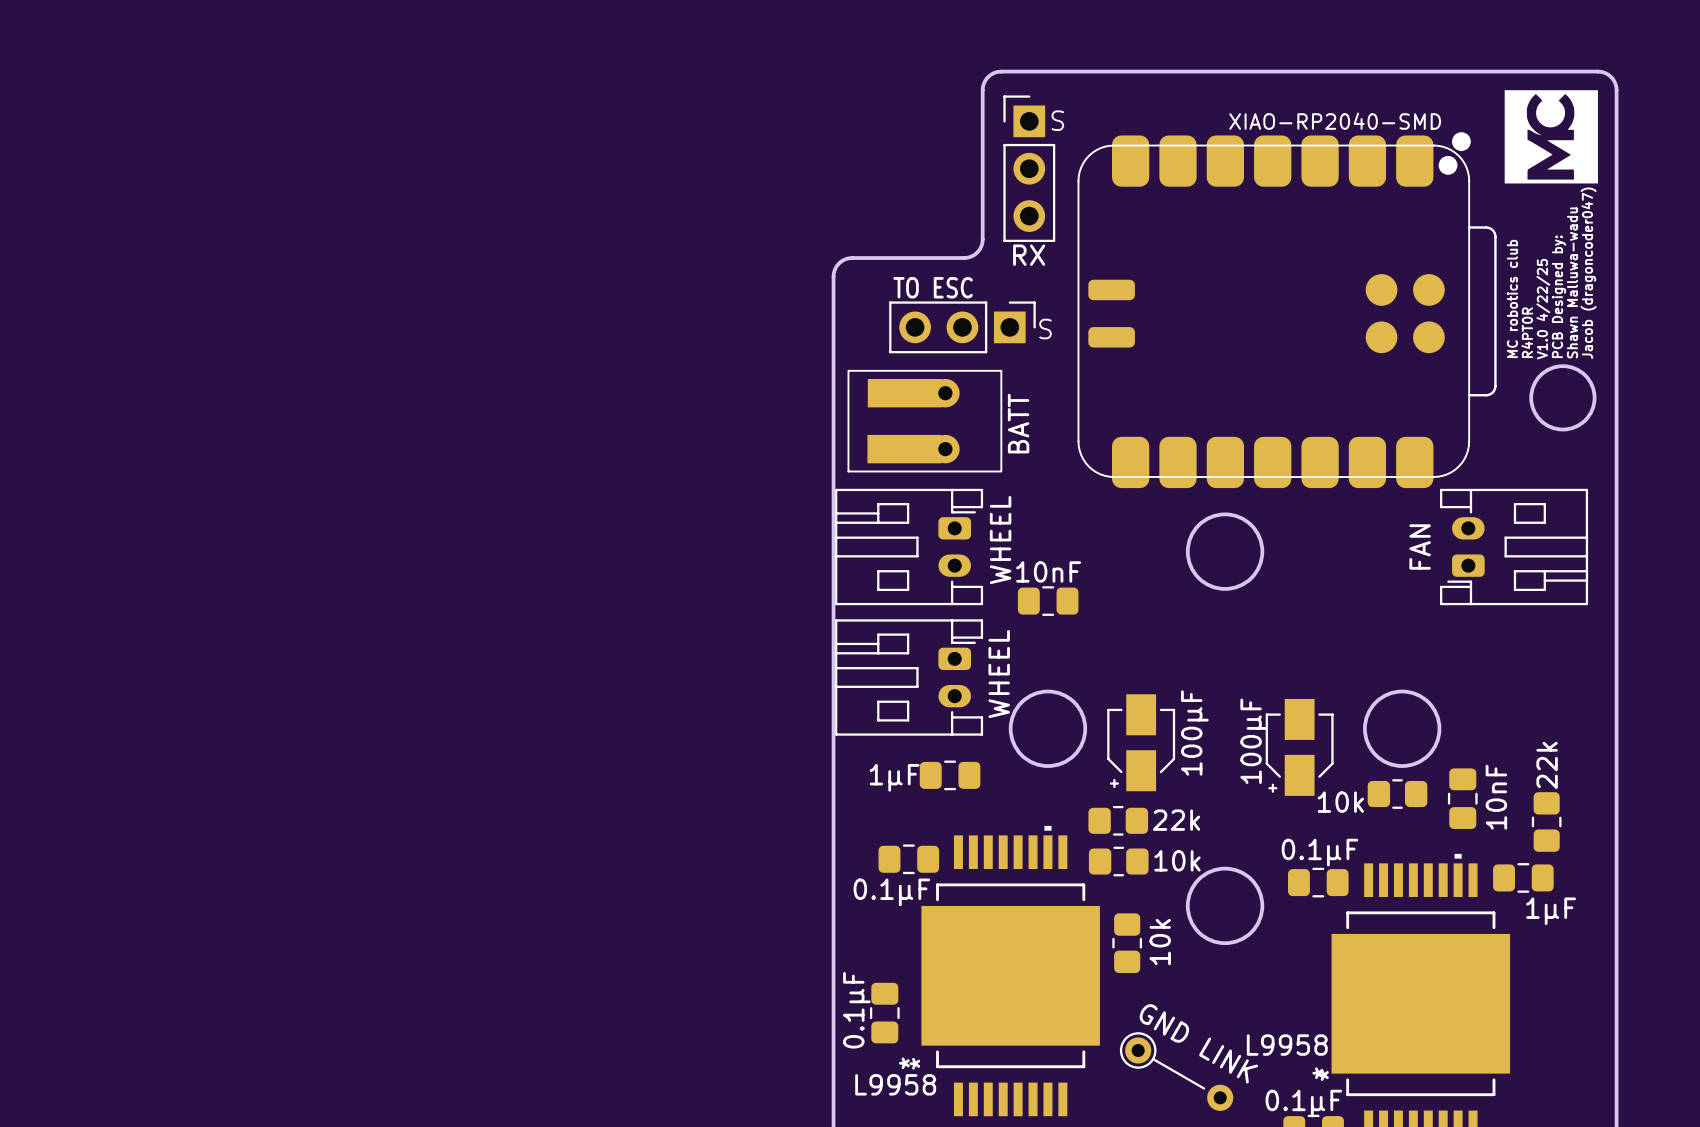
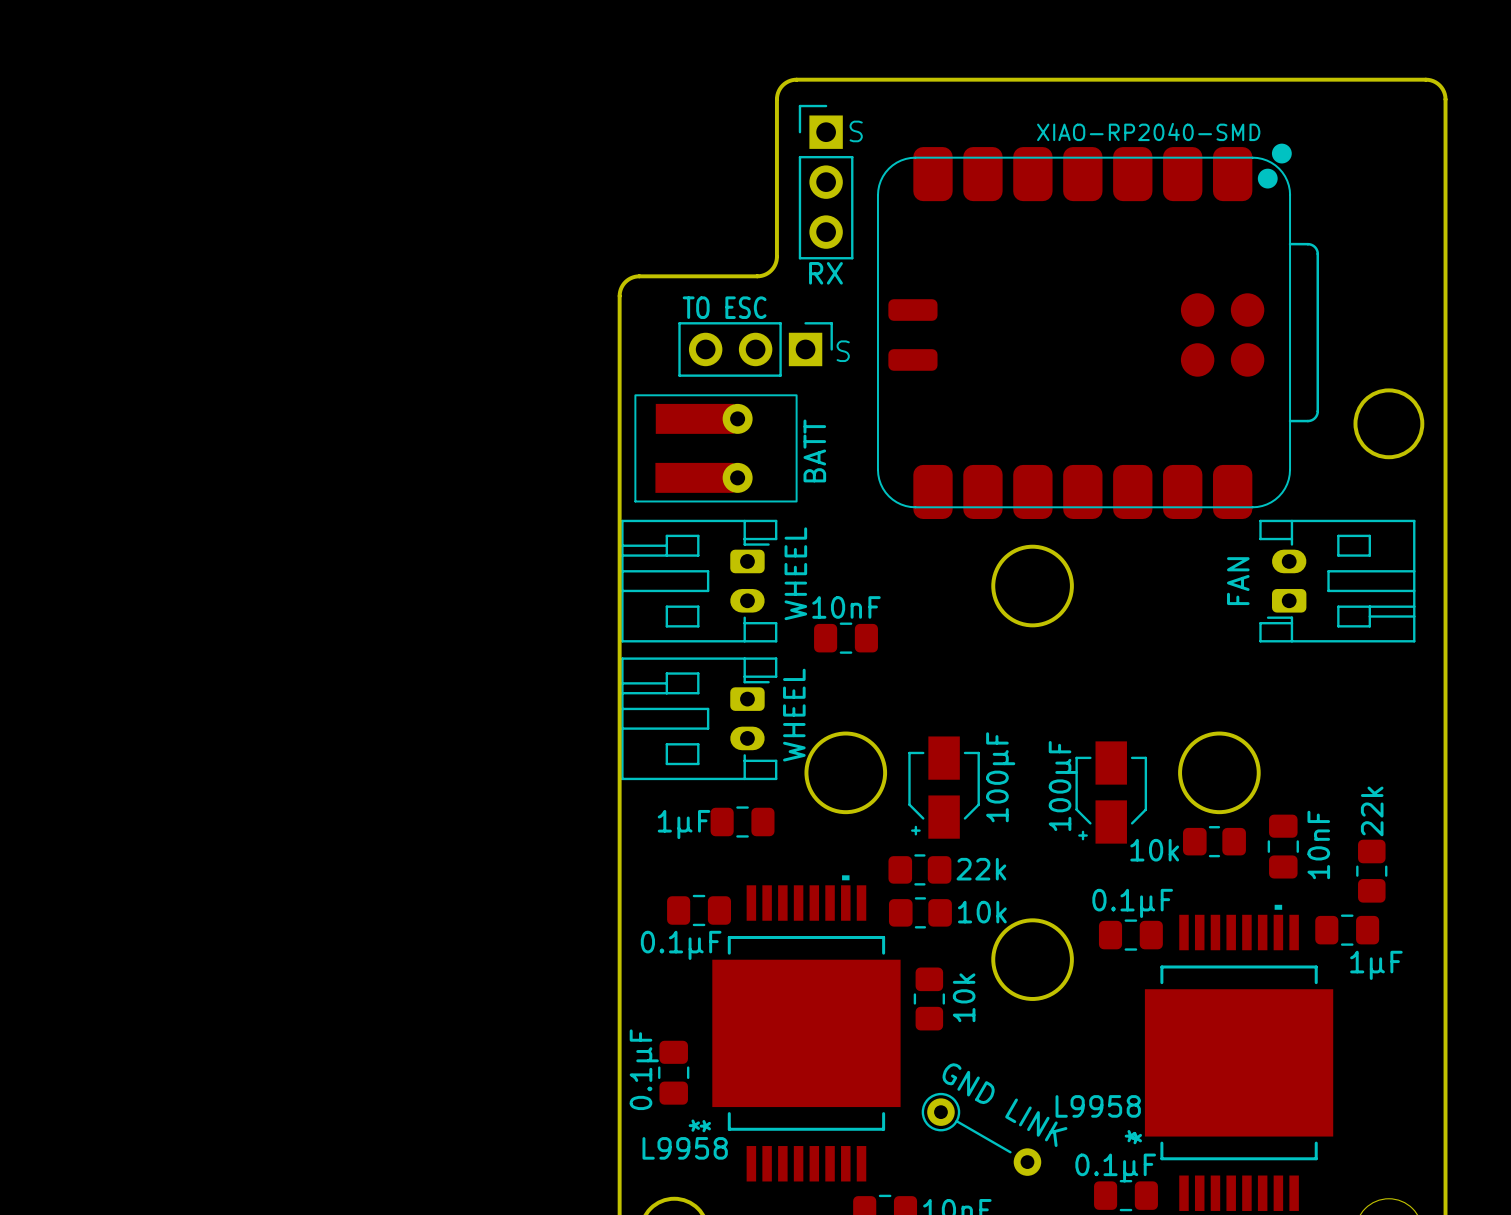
drawing: [1504, 90, 1598, 184] -> none
text: Jacob (dragoncoder047) (1588, 273) -> none
text: Shawn Malluwa-wadu (1572, 282) -> none
text: PCB Designed by: (1559, 296) -> none
text: MC robotics club (1512, 298) -> none
text: V1.0 4/22/25 (1543, 309) -> none
text: R4PT0R (1527, 332) -> none

